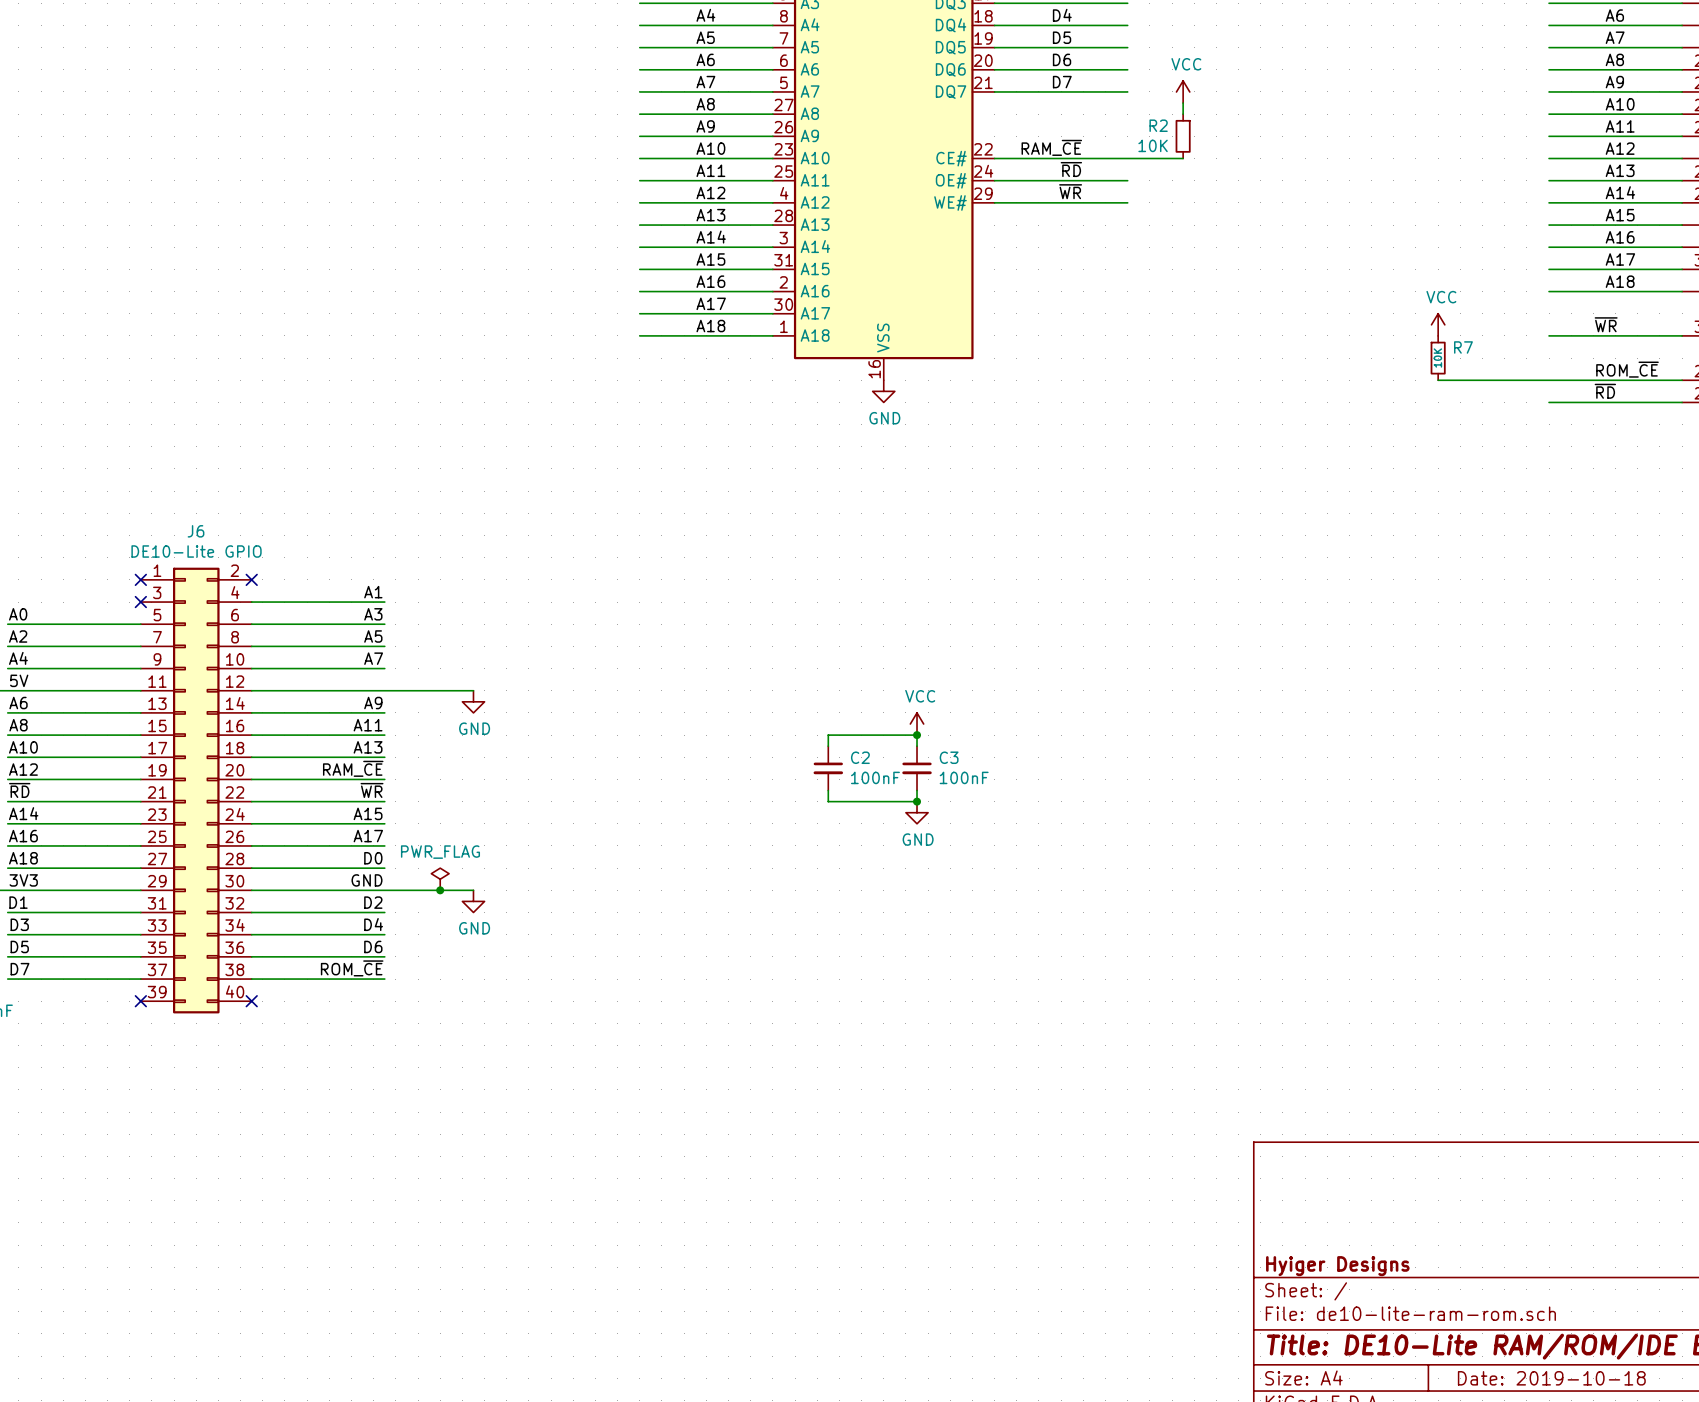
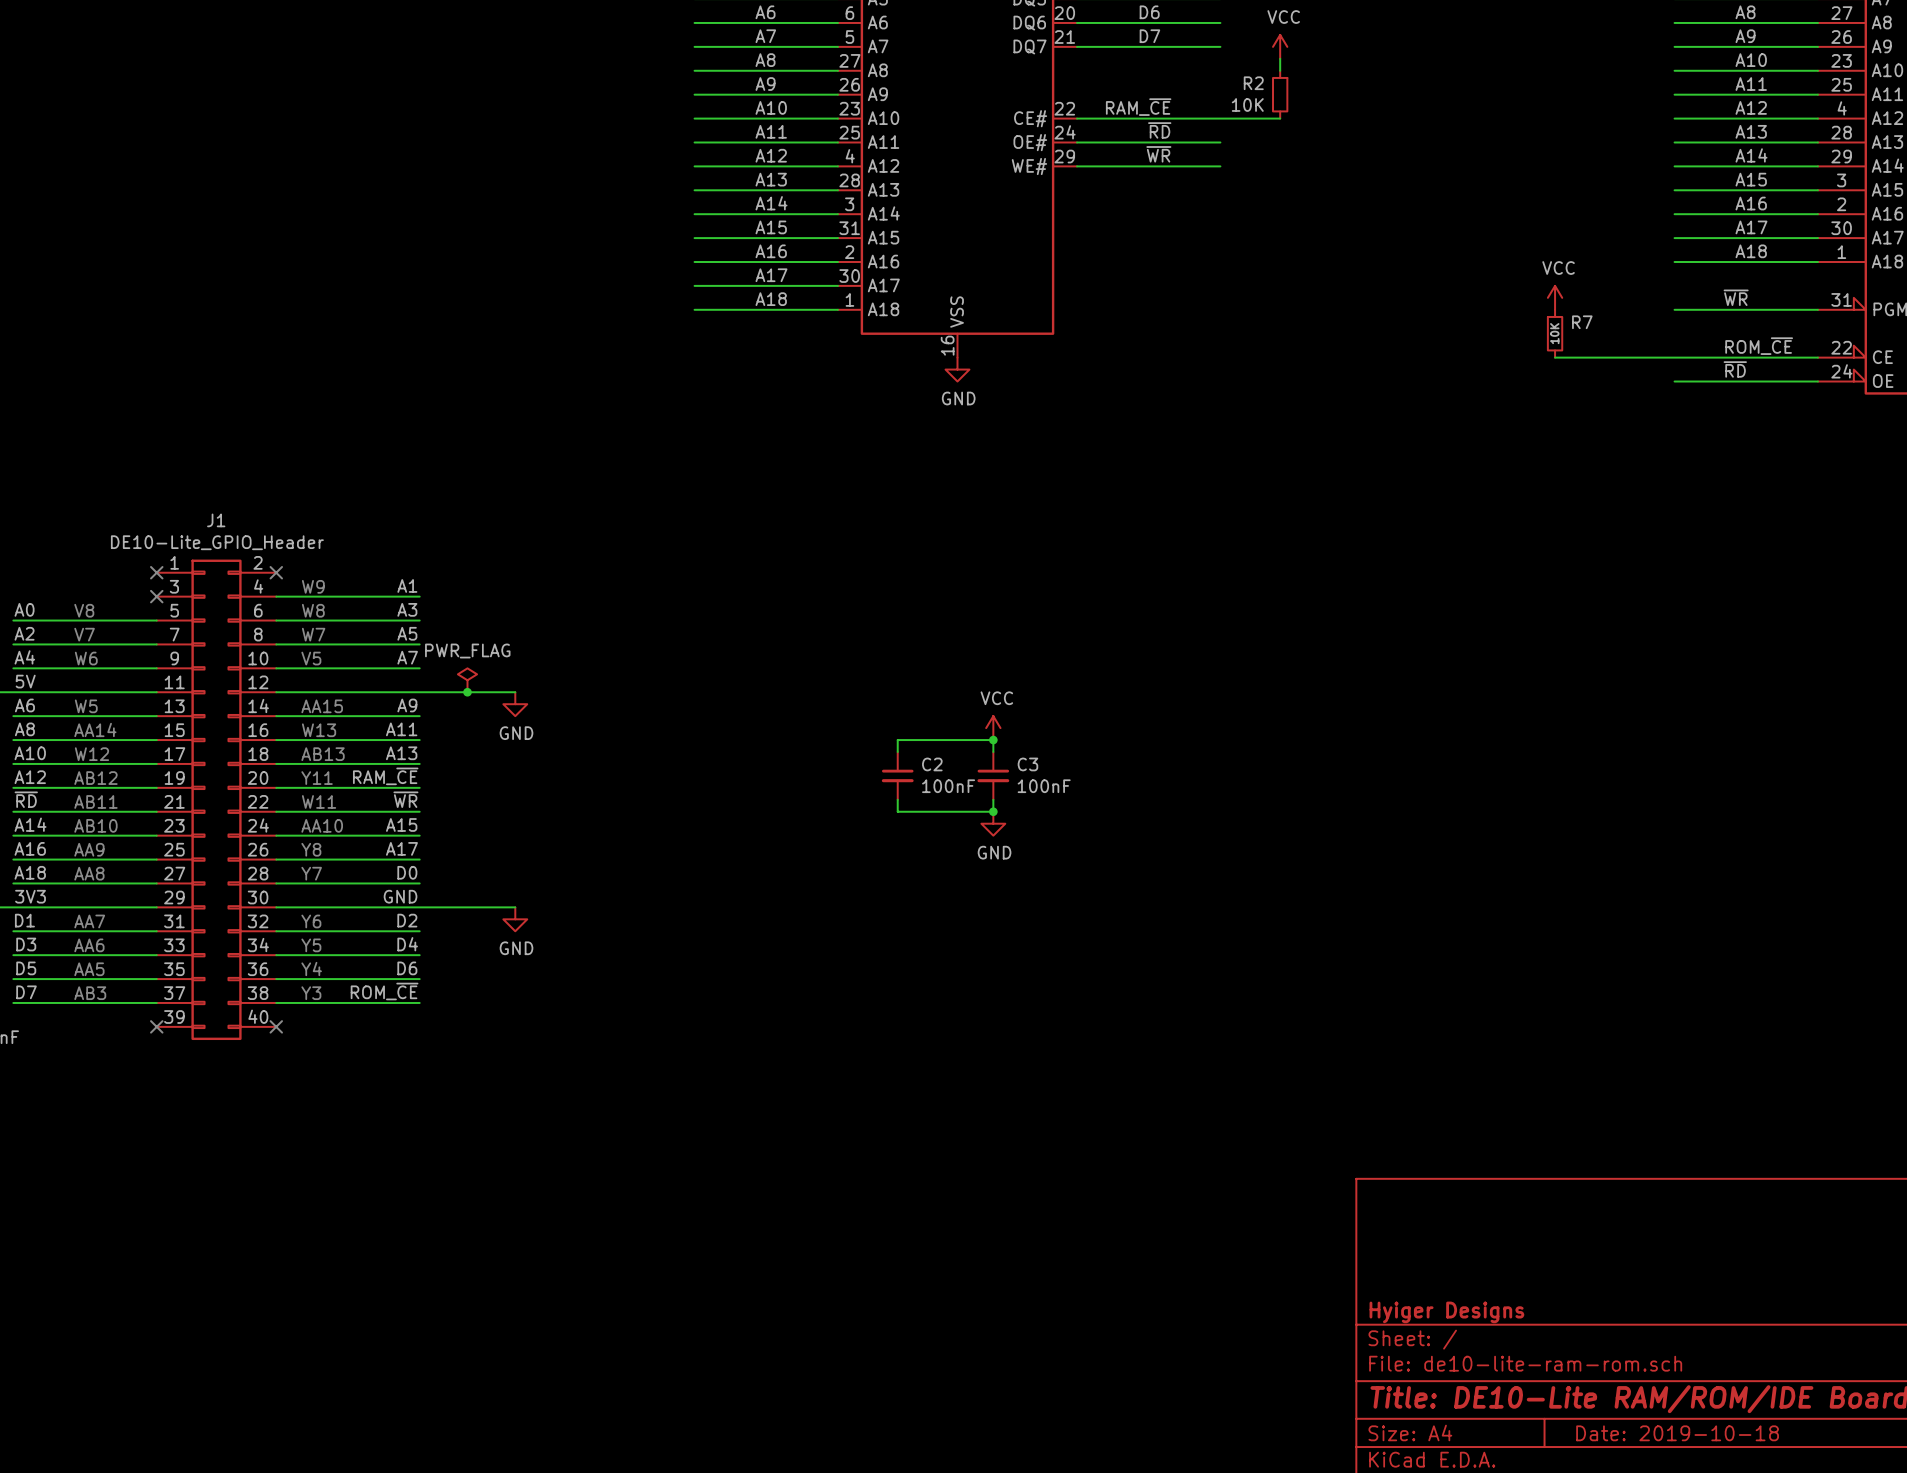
J6 name: J6 (196, 531) -> J1 (216, 520)
J6 value: DE10-Lite GPIO (196, 551) -> DE10-Lite_GPIO_Header (217, 542)
text: none -> W9 (313, 586)
text: none -> V8 (84, 610)
text: none -> W8 (313, 610)
text: none -> V7 (84, 634)
text: none -> W7 (313, 634)
text: none -> W6 (86, 658)
text: none -> V5 (311, 658)
junction: none -> (467, 692)
text: none -> W5 (86, 706)
text: none -> AA15 (322, 706)
text: none -> AA14 (95, 729)
text: none -> W13 (319, 730)
text: none -> W12 (91, 754)
text: none -> AB13 (323, 754)
text: none -> AB12 (95, 778)
text: none -> Y11 (317, 778)
text: none -> AB11 (95, 801)
text: none -> W11 (319, 801)
text: none -> AB10 (95, 825)
text: none -> AA10 (322, 825)
text: none -> AA9 (89, 849)
text: none -> Y8 (311, 849)
text: none -> AA8 (89, 873)
text: none -> Y7 (311, 873)
power symbol position: PWR_FLAG (440, 879) -> PWR_FLAG (467, 680)
junction: (440, 890) -> none
text: none -> AA7 (89, 921)
text: none -> Y6 (311, 921)
text: none -> AA6 (89, 945)
text: none -> Y5 (311, 945)
text: none -> AA5 (89, 969)
text: none -> Y4 (311, 969)
text: none -> AB3 (90, 993)
text: none -> Y3 (311, 993)

